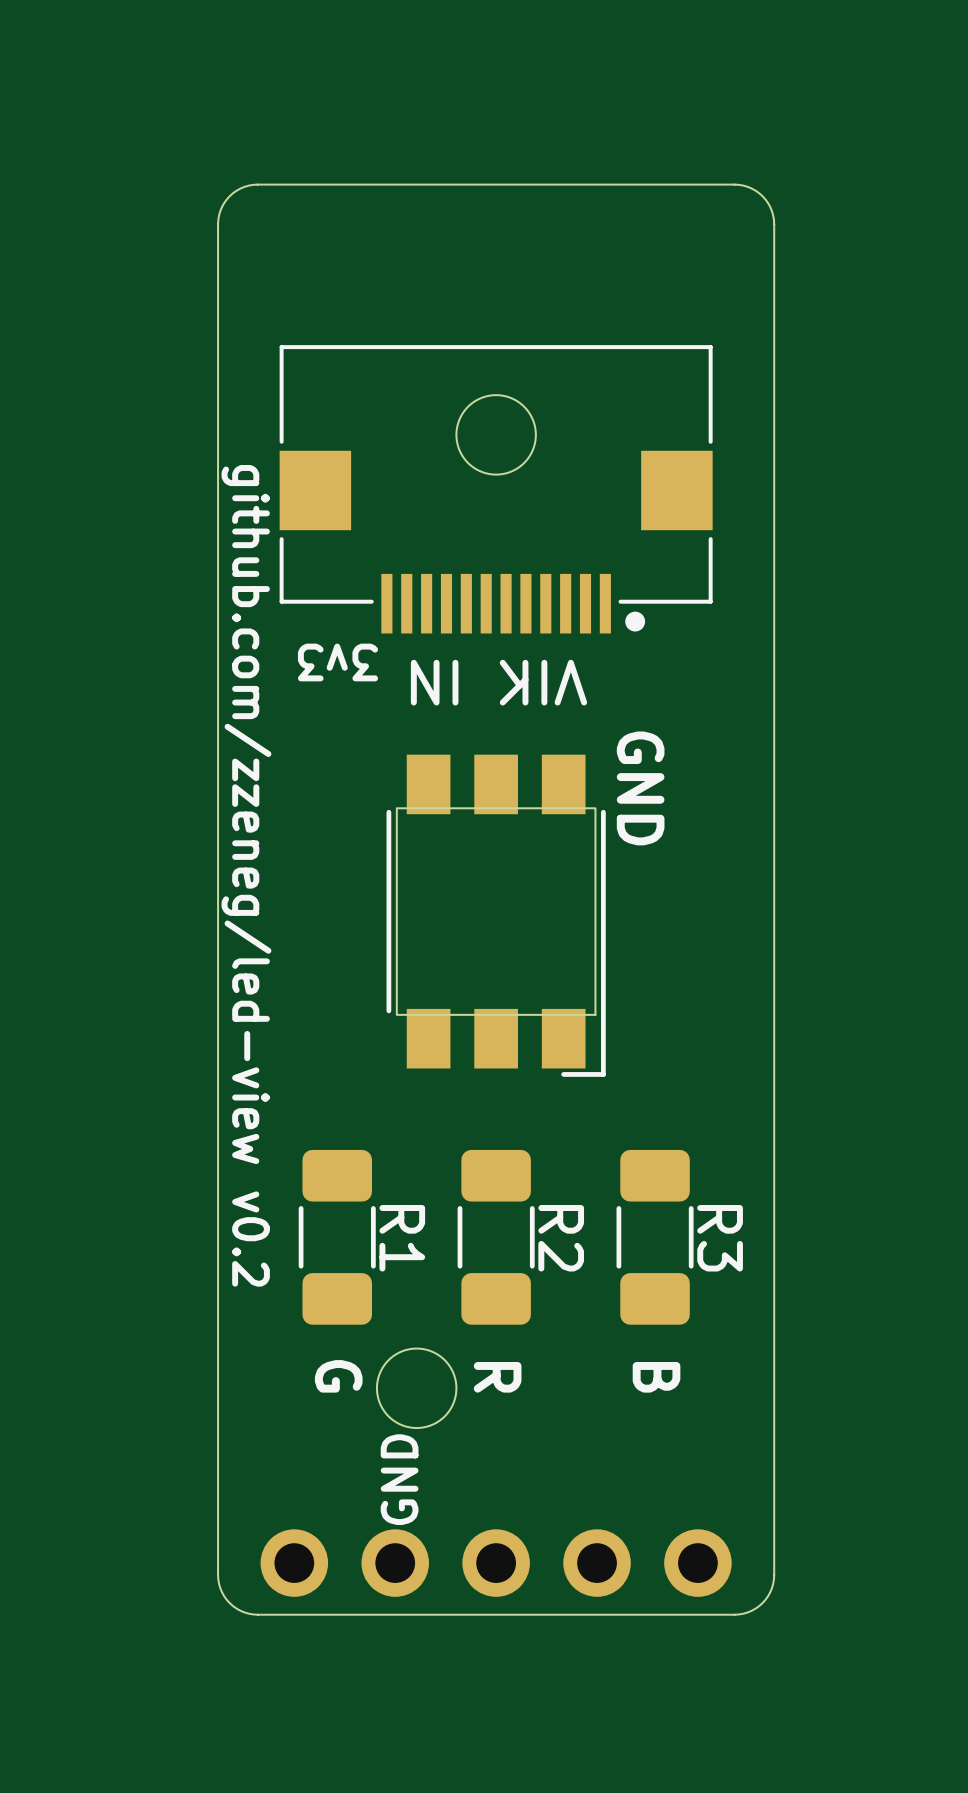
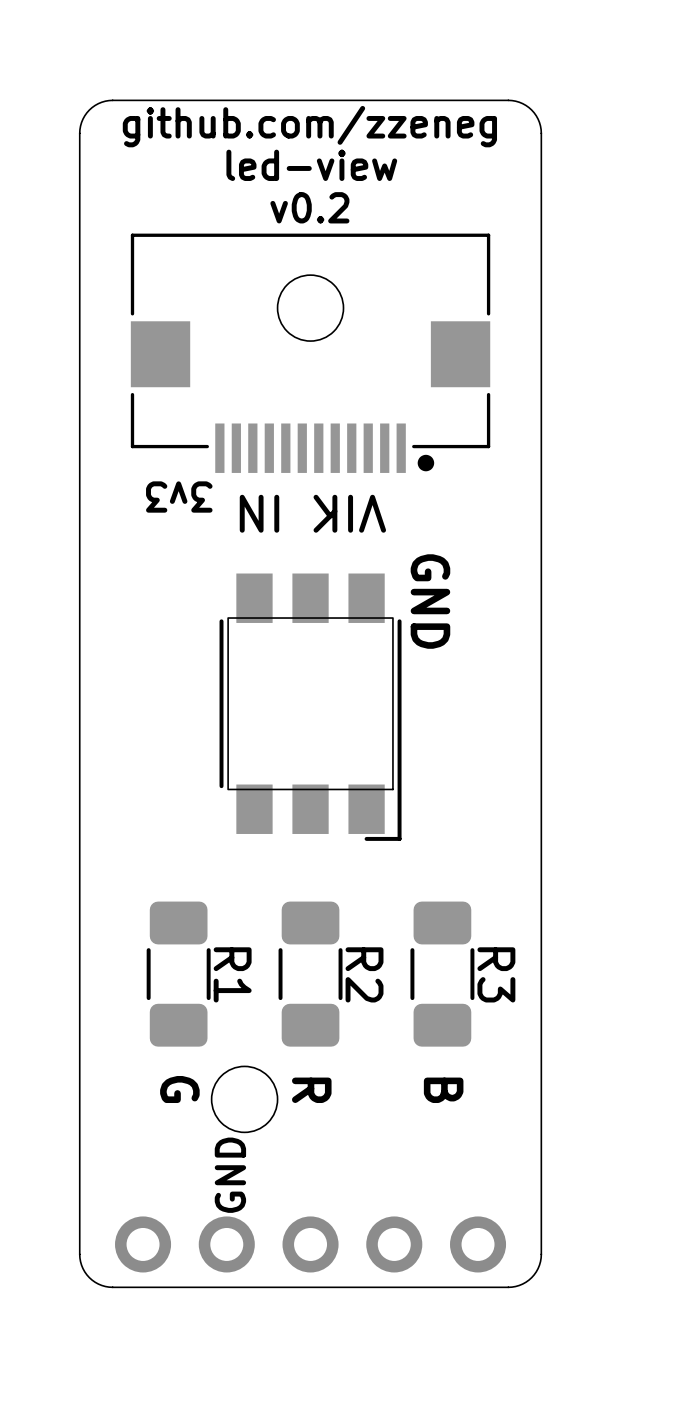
text: none -> github.com/zzeneg (309, 126)
text: none -> led-view (311, 165)
text: none -> v0.2 (309, 207)
text: github.com/zzeneg/led-view v0.2 (246, 875) -> none

